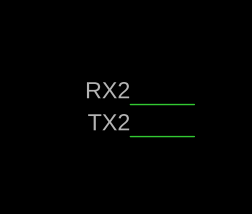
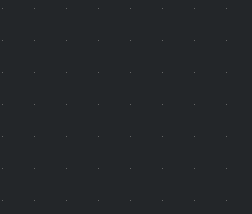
label: RX2 (108, 90) -> none
wire: (130, 104) (194, 104) -> none
label: TX2 (108, 122) -> none
wire: (130, 136) (194, 136) -> none

